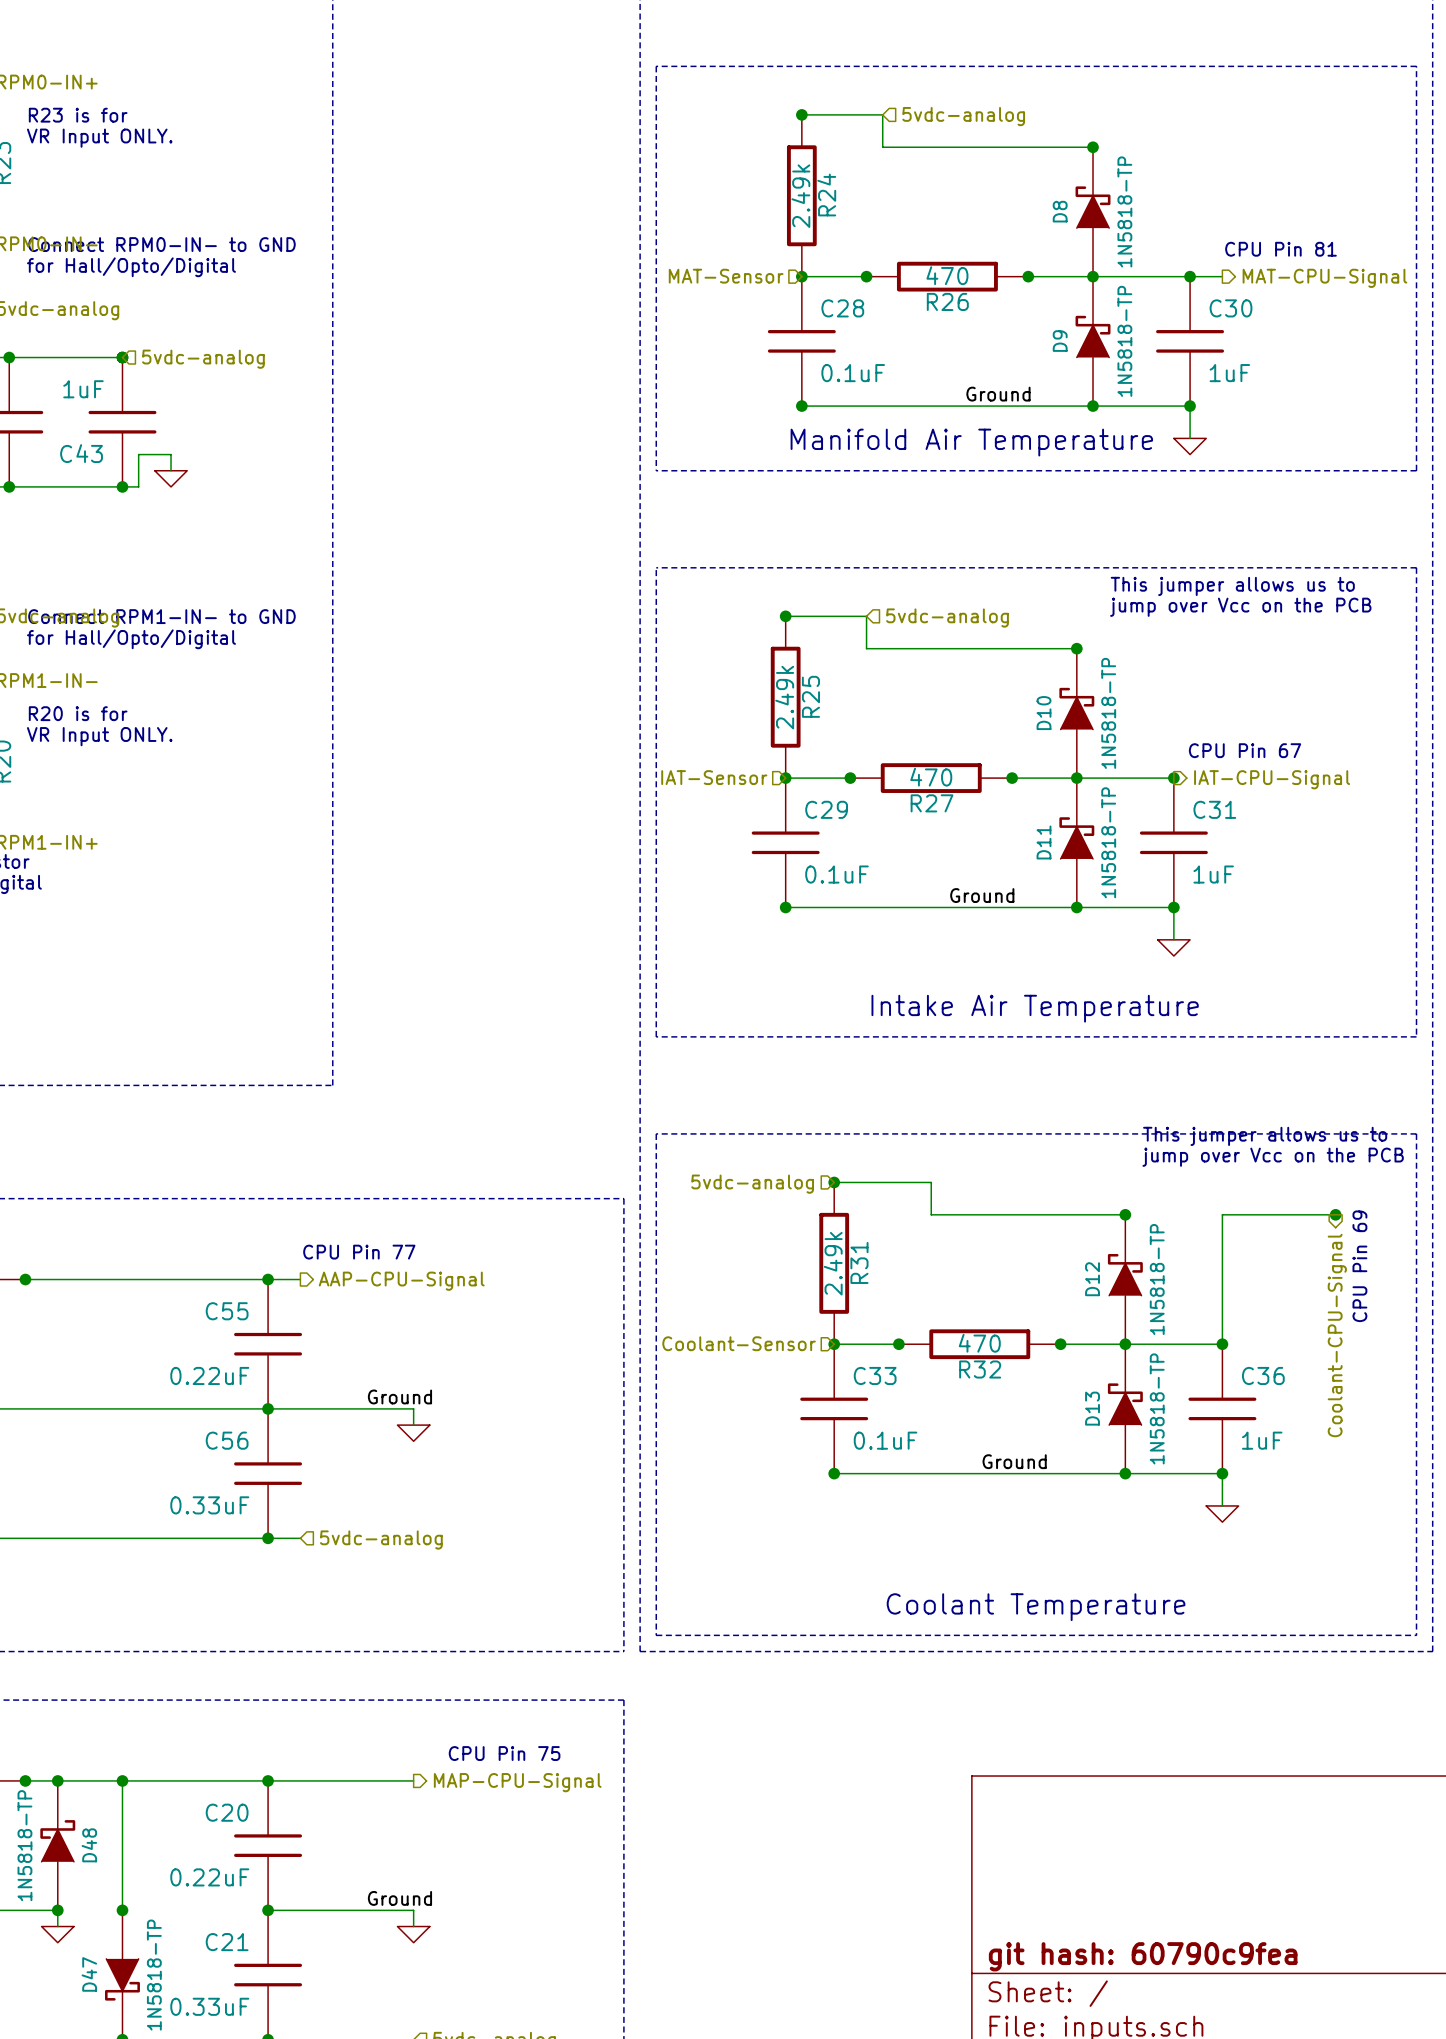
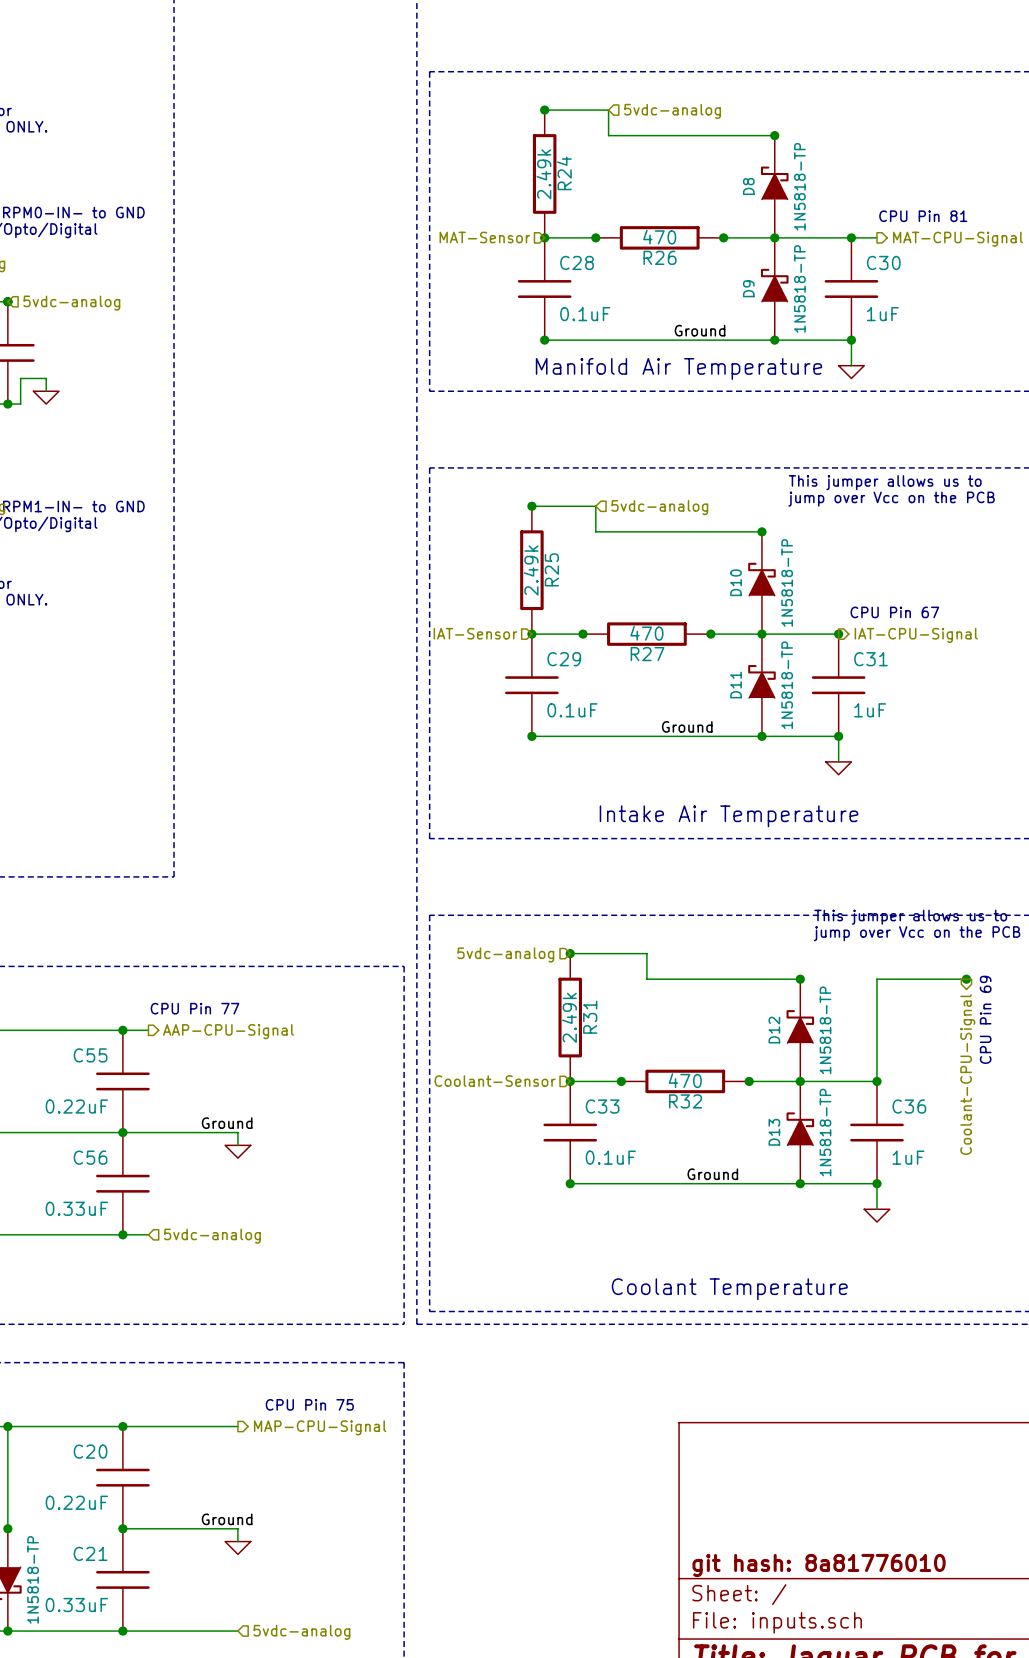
title block: git hash: 60790c9fea (1143, 1956) -> git hash: 8a81776010 (819, 1565)

